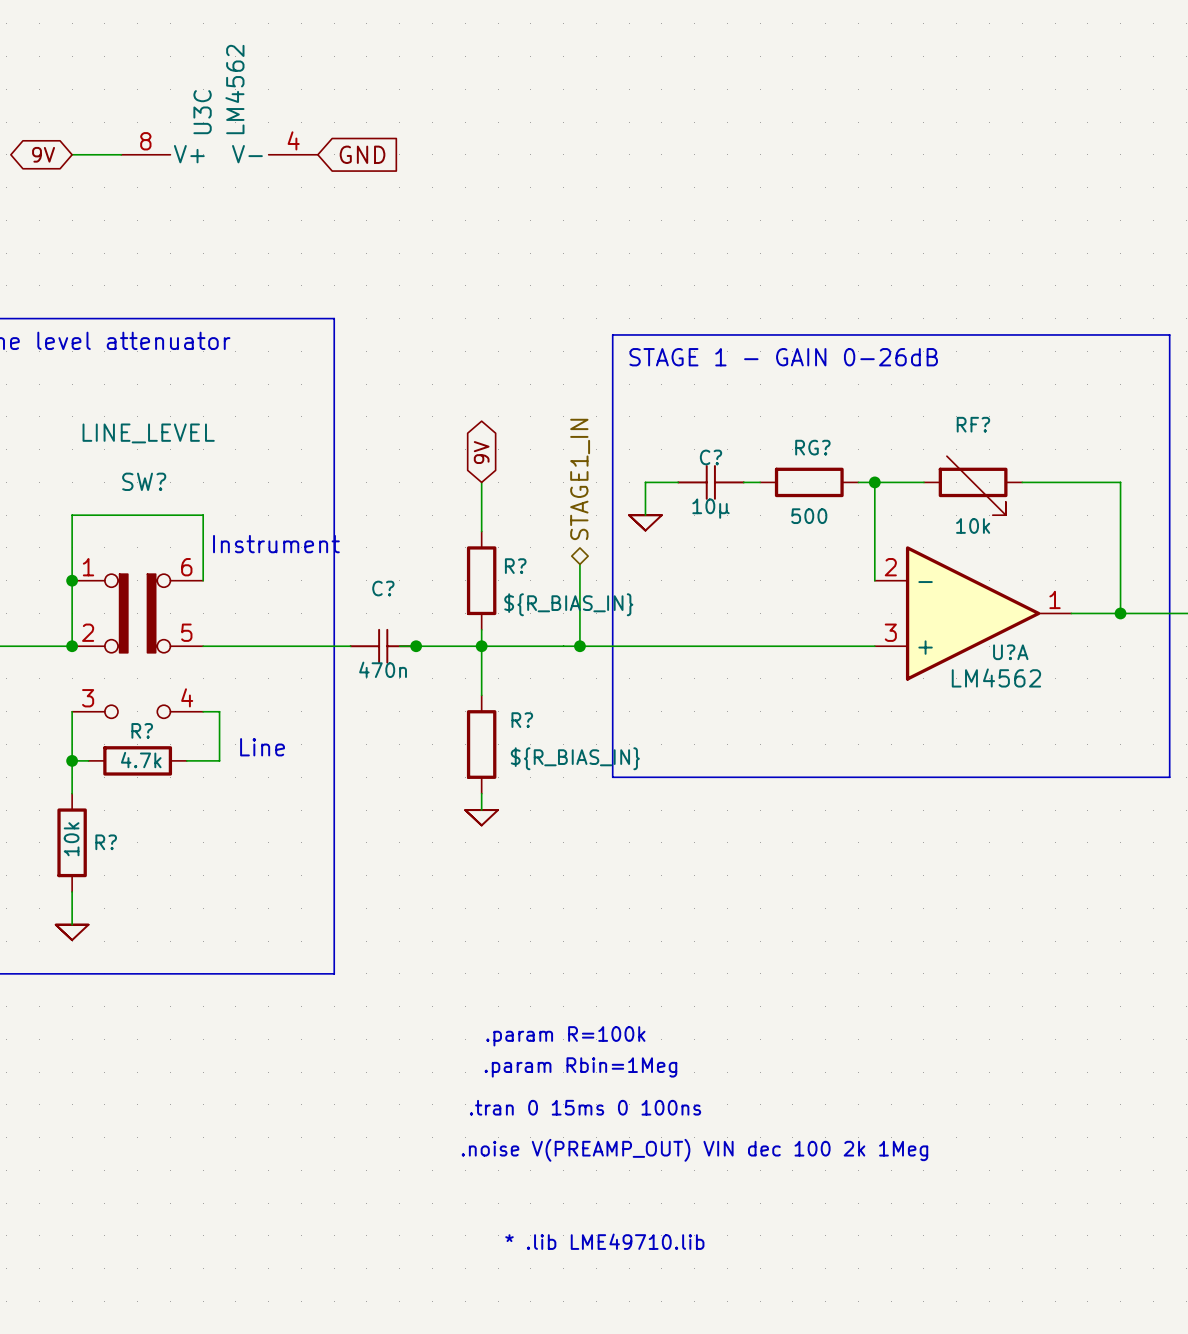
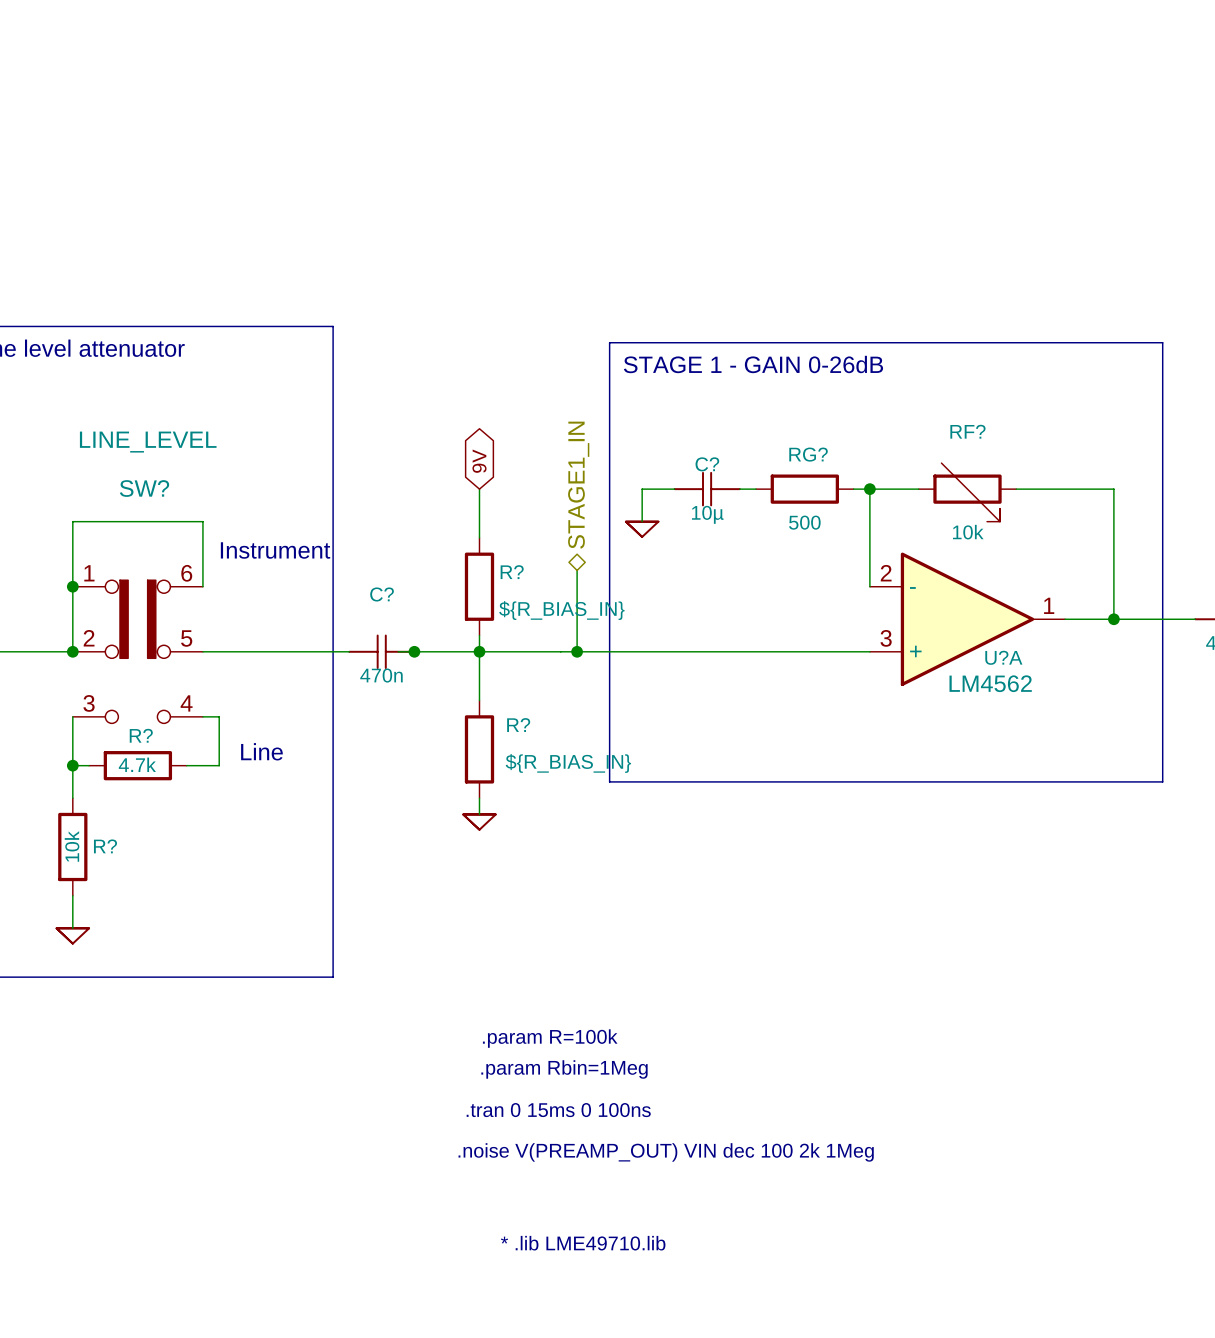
global label: 9V (43, 154) -> none
wire: (72, 154) (121, 154) -> none
U3C: LM4562 (219, 154) -> none
global label: GND (362, 154) -> none

